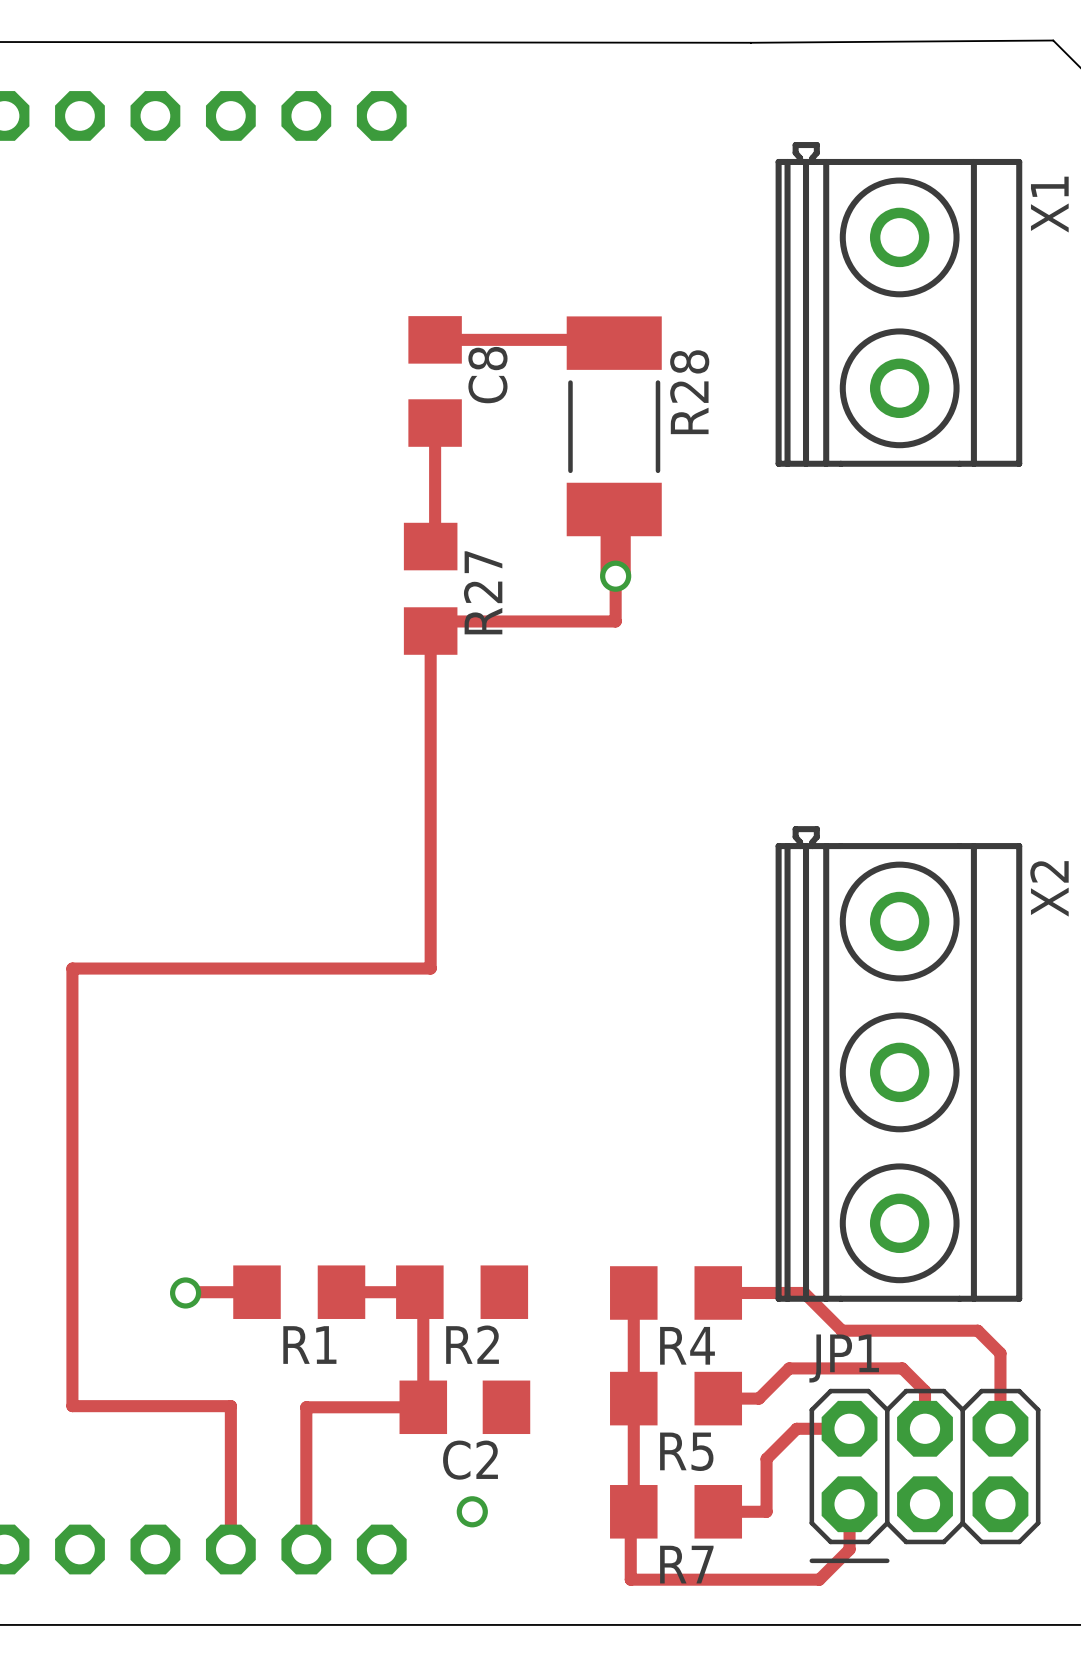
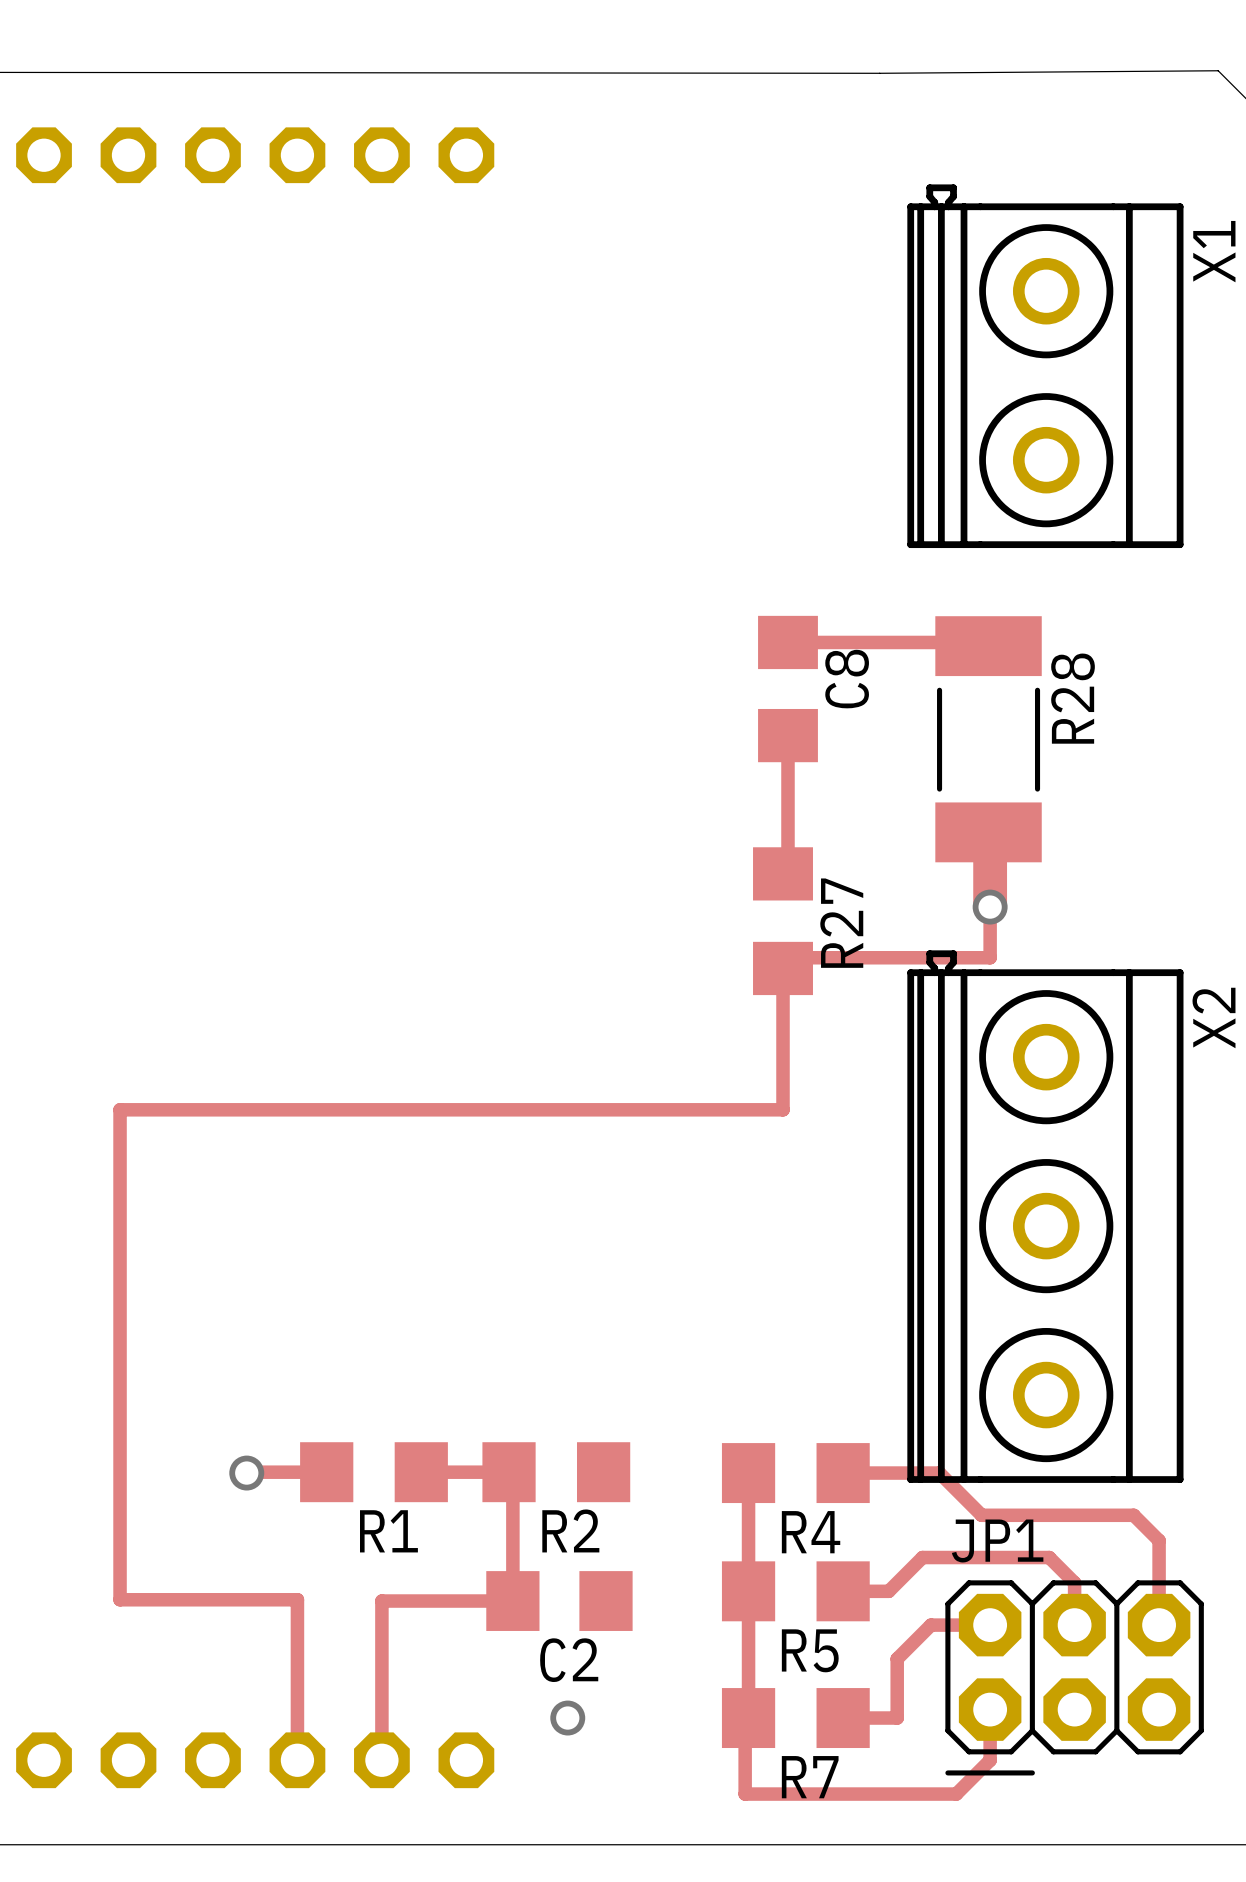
track: (614, 342) (610, 339) (435, 339) (432, 349) -> (988, 645) (984, 642) (787, 642) (785, 653)
C8 position: (435, 381) -> (787, 689)
track: (435, 423) (435, 542) (430, 546) -> (787, 735) (787, 868) (783, 873)
R28 position: (614, 426) -> (988, 739)
track: (614, 509) (615, 621) (440, 621) (430, 631) (430, 968) -> (988, 832) (990, 832) (990, 957) (793, 957) (783, 968) (783, 1109) (521, 1109)
via: (615, 576) -> none
R27 position: (430, 588) -> (783, 921)
via: none -> (990, 907)

